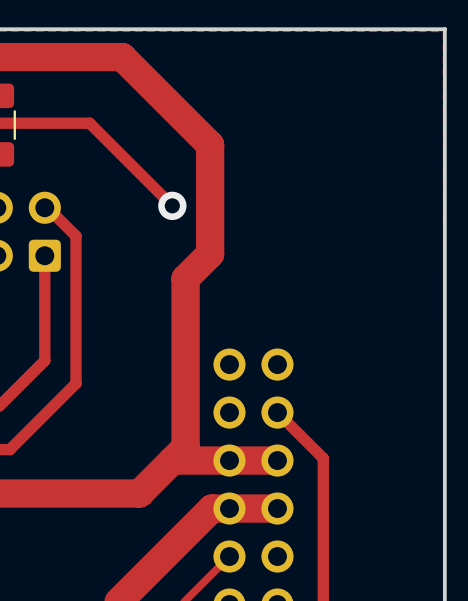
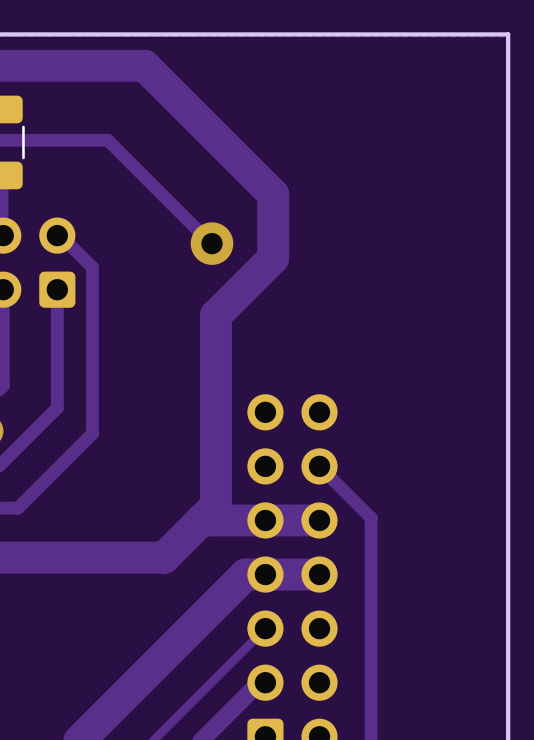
track: (210, 144) (210, 254) -> (243, 164) (273, 194) (273, 258) (243, 287)
via size: [158, 191, 187, 221] -> [190, 222, 234, 265]

